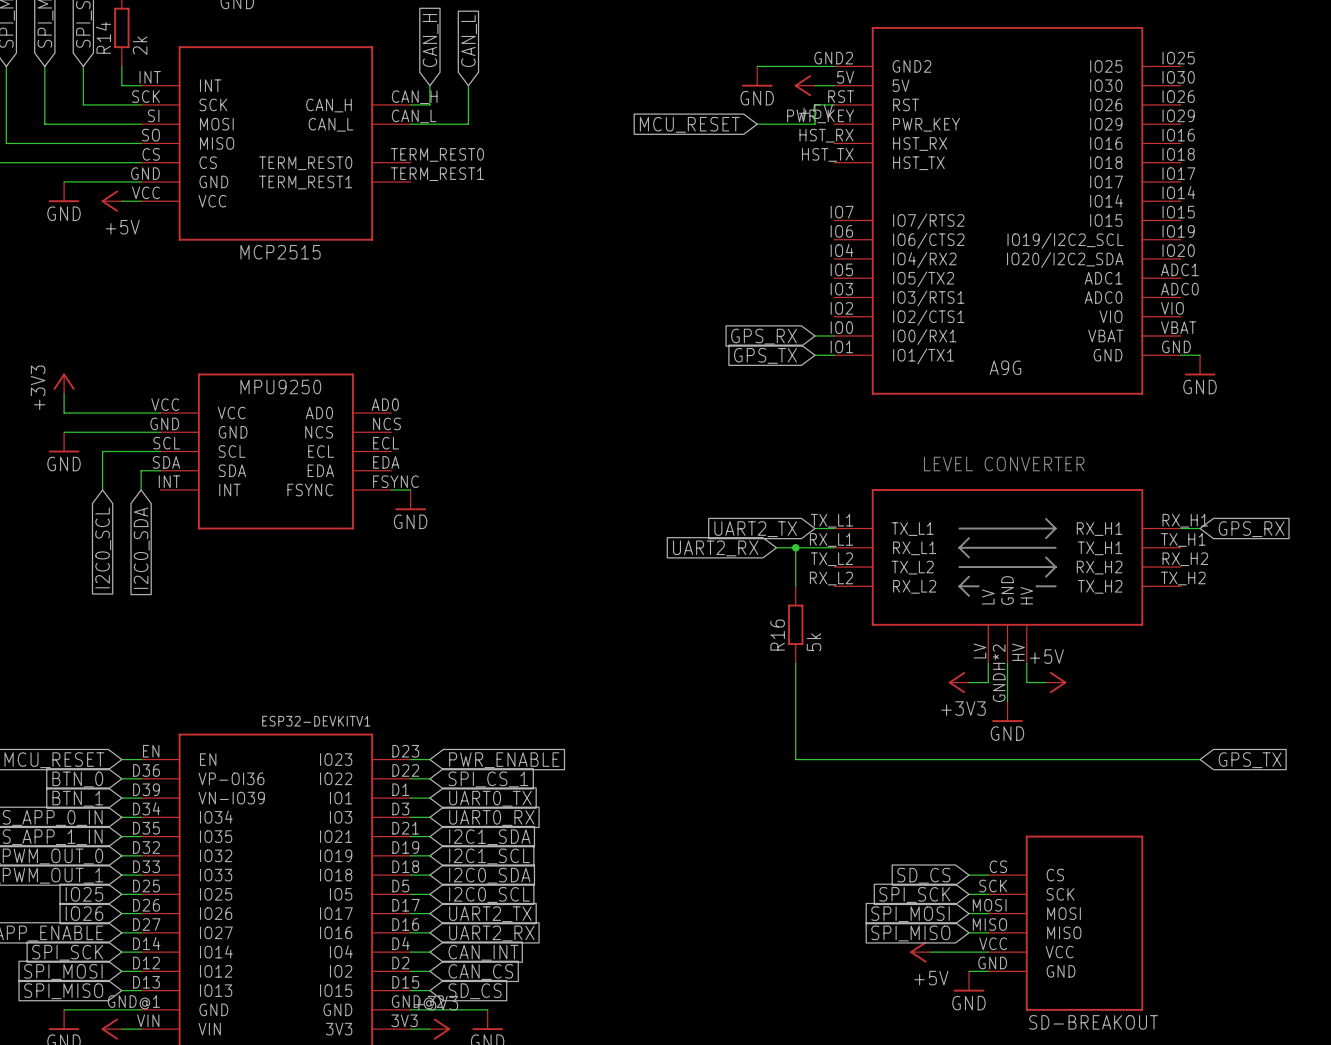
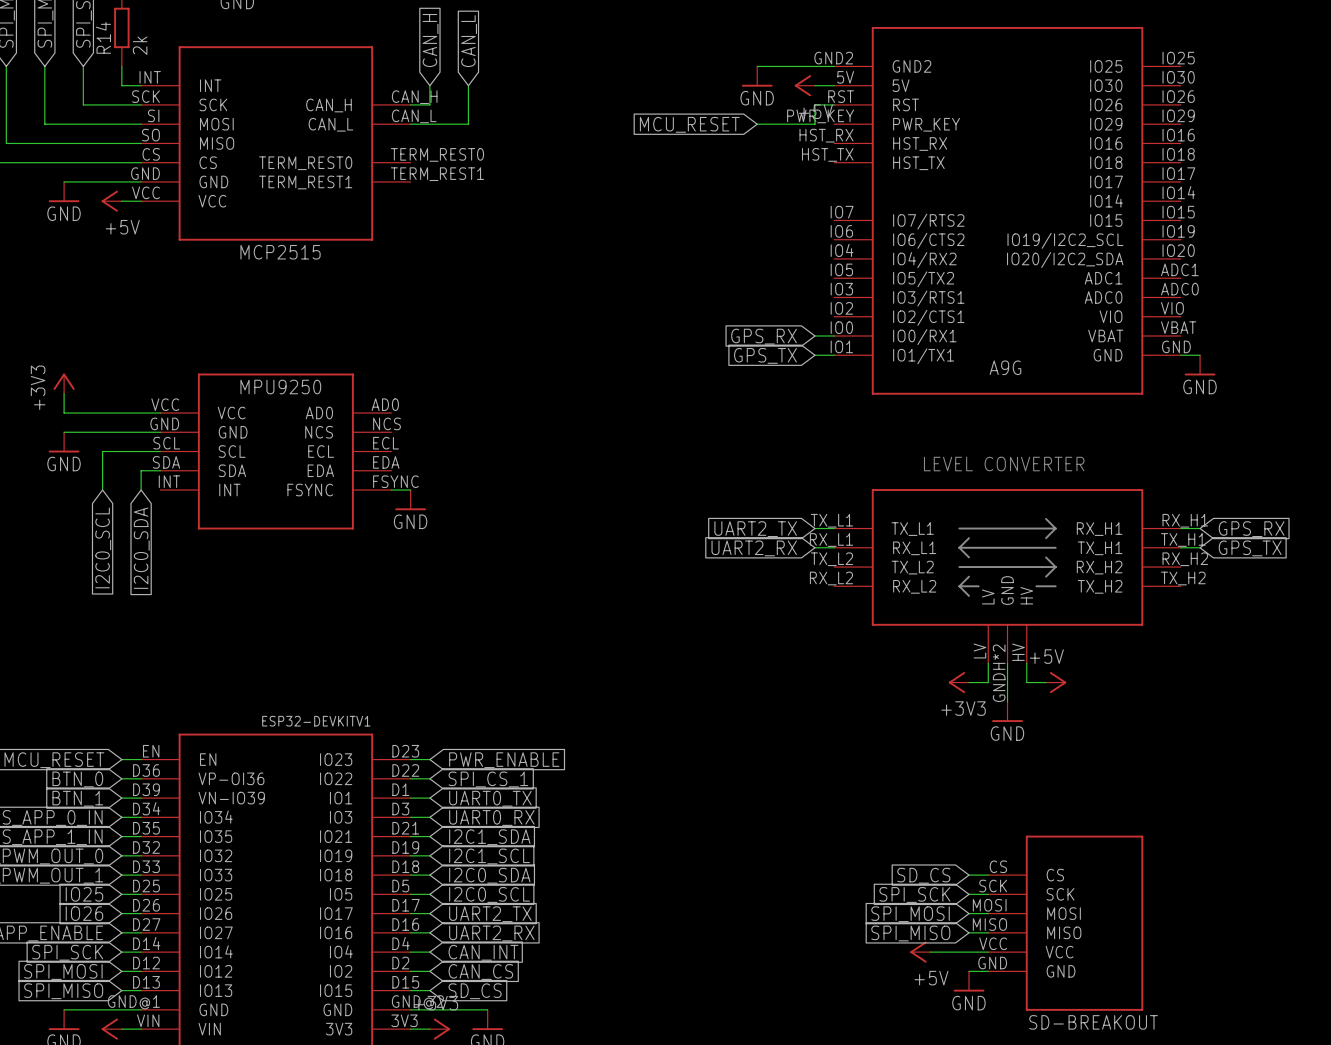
wire: (776, 547) (814, 547) -> none
wire: (795, 547) (795, 586) -> none
junction: (795, 547) -> none
wire: none -> (1180, 547) (1200, 547)
global label position: UART2_RX (715, 548) -> UART2_RX (754, 548)
global label: none -> GPS_TX (1250, 548)
R16: 5k (795, 624) -> none
wire: (795, 663) (795, 759) (1200, 759) -> none
global label: GPS_TX (1250, 760) -> none

